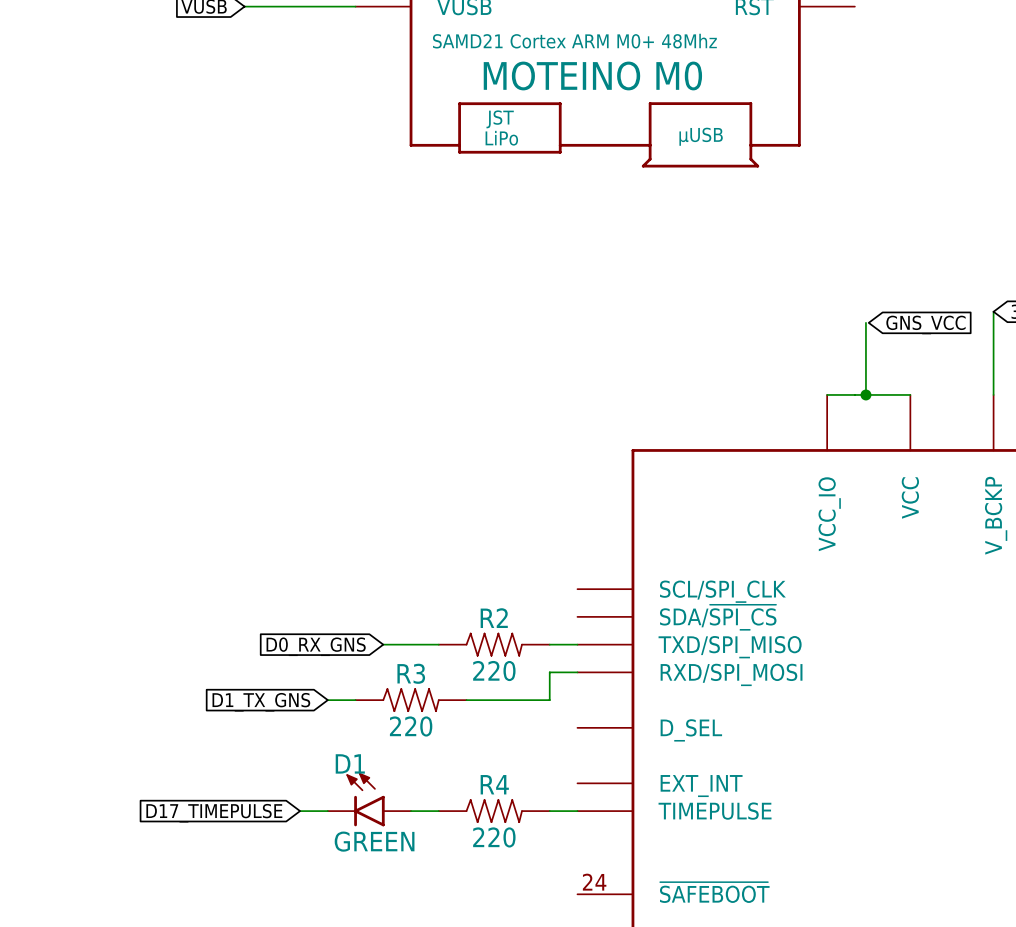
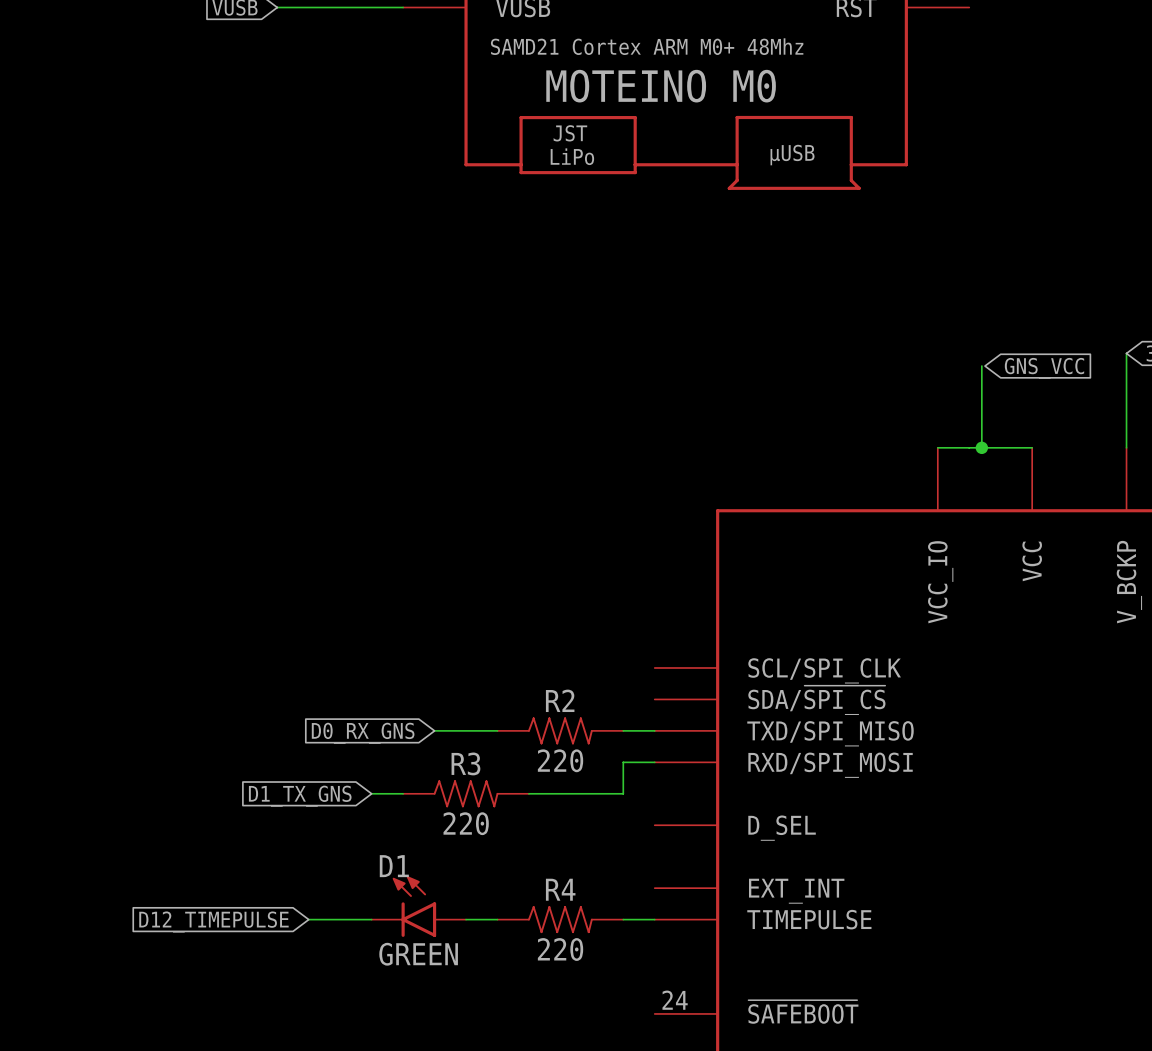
wire: none -> (308, 919) (340, 919)
global label: D17_TIMEPULSE (214, 813) -> D12_TIMEPULSE (213, 922)

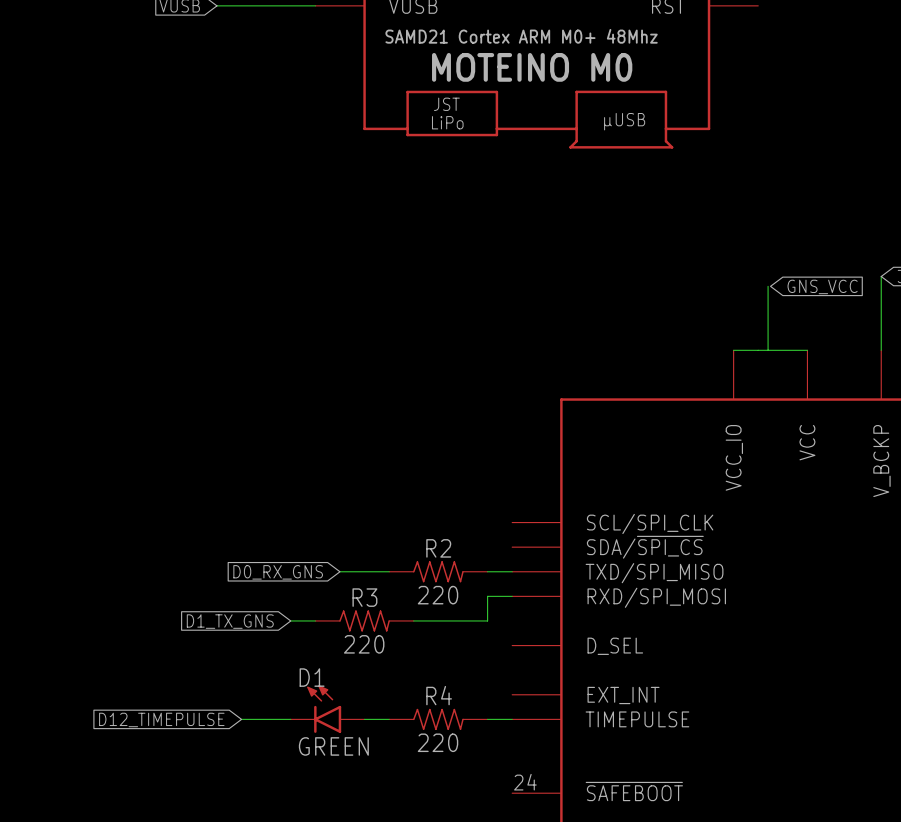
junction: (981, 447) -> none

